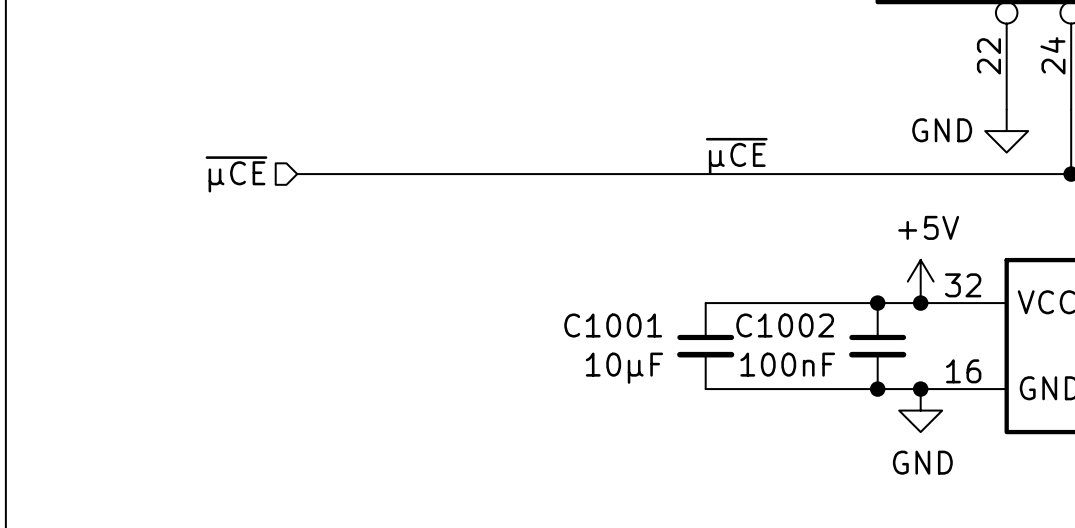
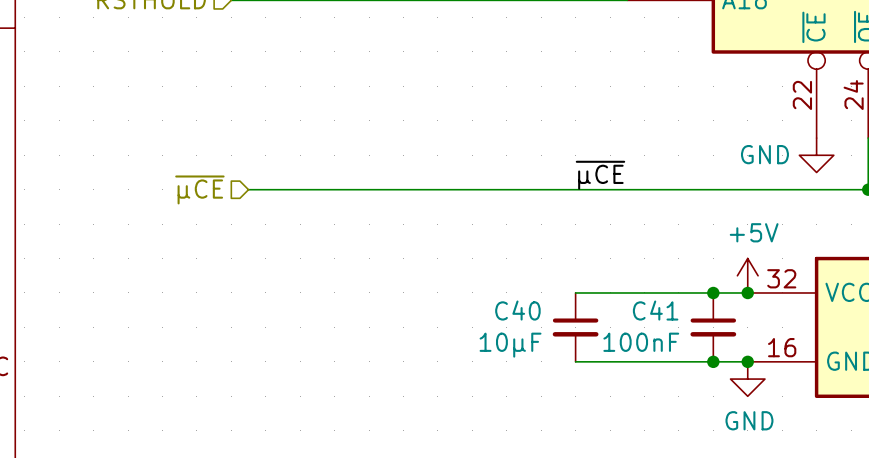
C1001 name: C1001 (613, 325) -> C40 (517, 310)
C1002 name: C1002 (785, 325) -> C41 (655, 310)

